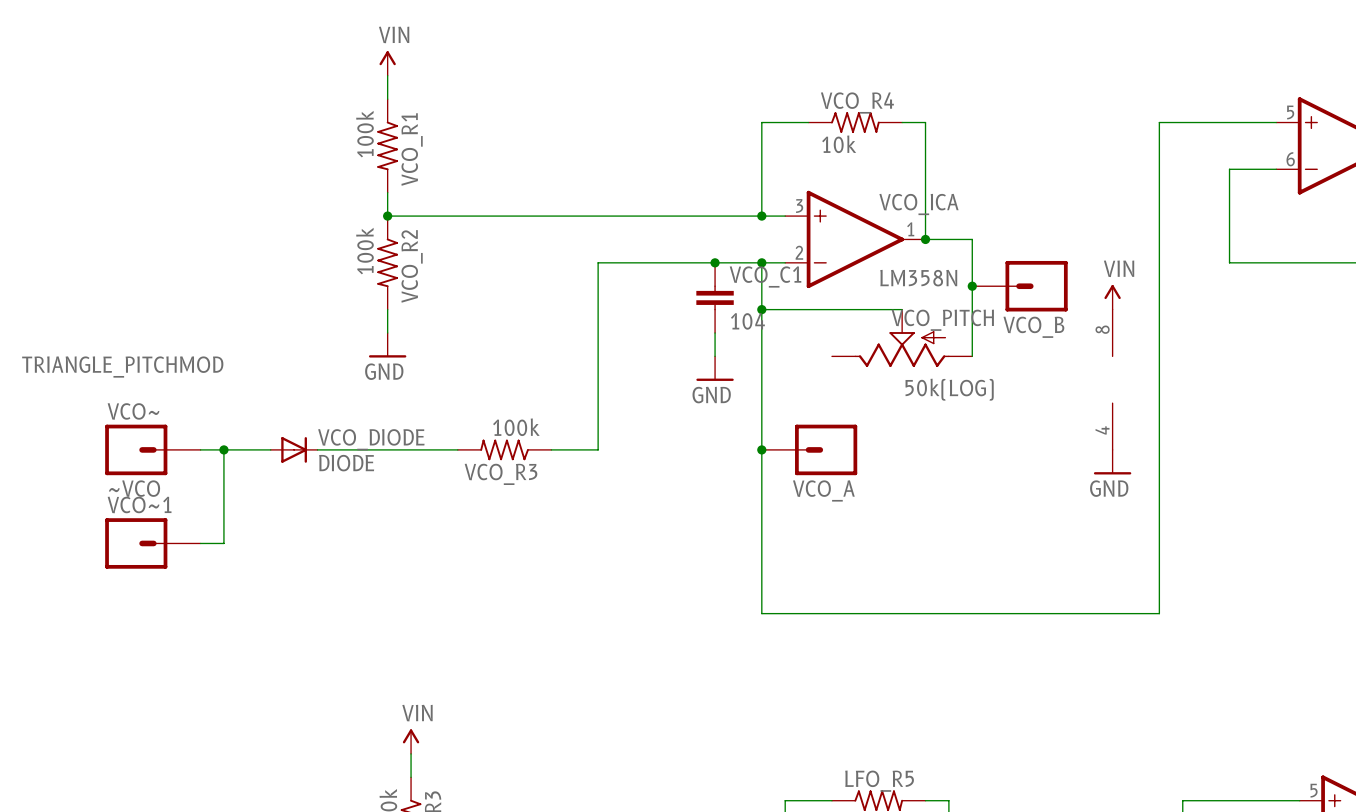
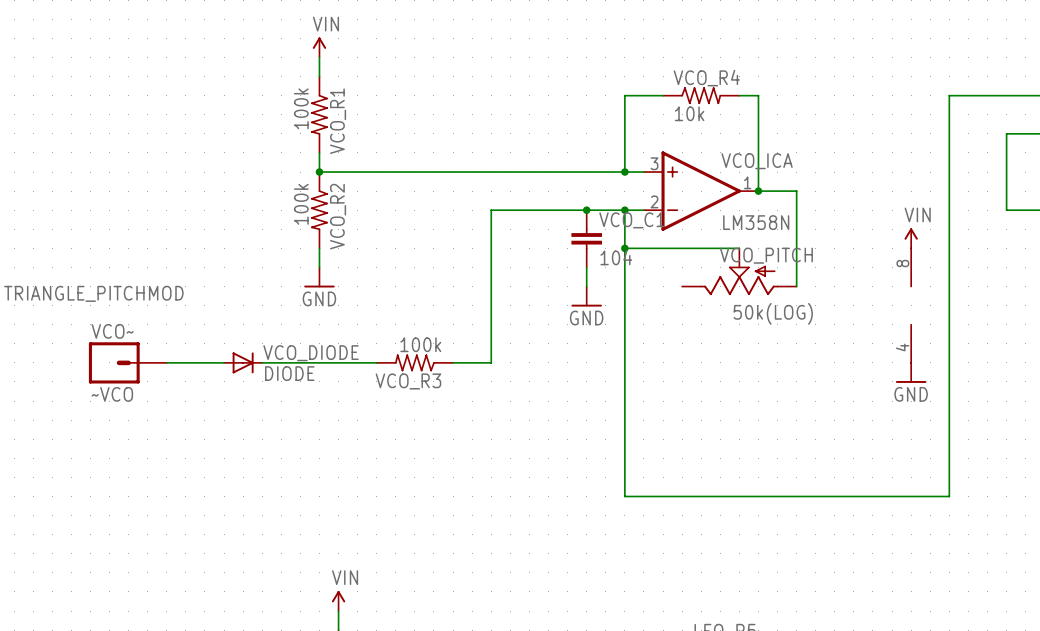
junction: (972, 286) -> none
VCO_B: (1019, 286) -> none
wire: (223, 449) (223, 543) (200, 543) -> none
junction: (223, 449) -> none
junction: (761, 449) -> none
VCO_A: (809, 449) -> none
VCO~1: (152, 543) -> none

